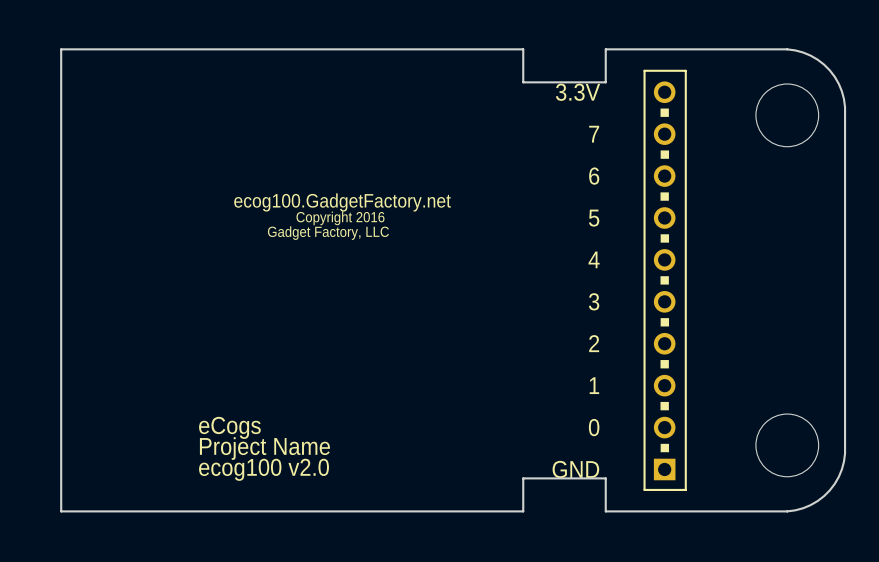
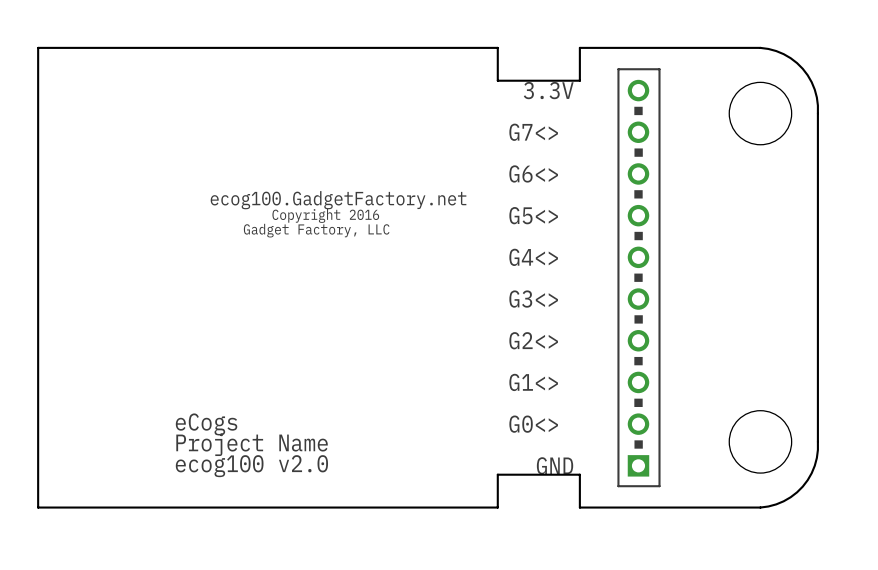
text: 7 (594, 134) -> G7<> (533, 132)
text: 6 (594, 176) -> G6<> (533, 173)
text: 5 (594, 218) -> G5<> (533, 215)
text: 4 (594, 259) -> G4<> (533, 257)
text: 3 (594, 301) -> G3<> (533, 299)
text: 2 (594, 343) -> G2<> (533, 340)
text: 1 (594, 385) -> G1<> (533, 382)
text: 0 (594, 427) -> G0<> (533, 424)

